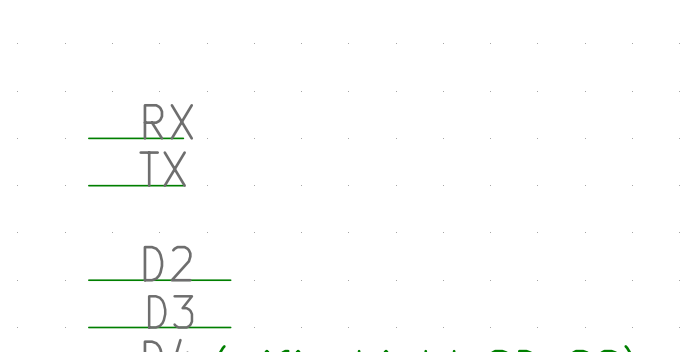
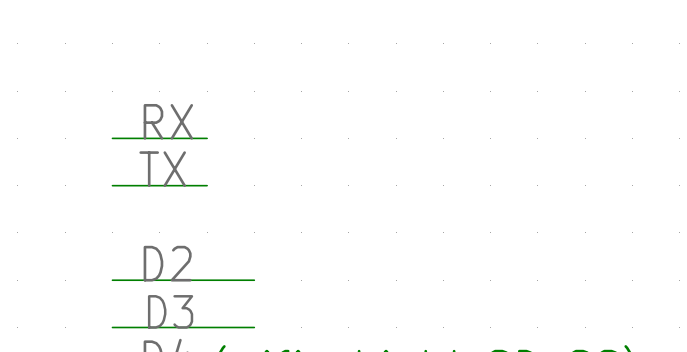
wire: (88, 138) (112, 138) -> (183, 138) (207, 138)
wire: (88, 185) (112, 185) -> (183, 185) (207, 185)
wire: (88, 280) (112, 280) -> (230, 280) (254, 280)
wire: (88, 327) (112, 327) -> (230, 327) (254, 327)

